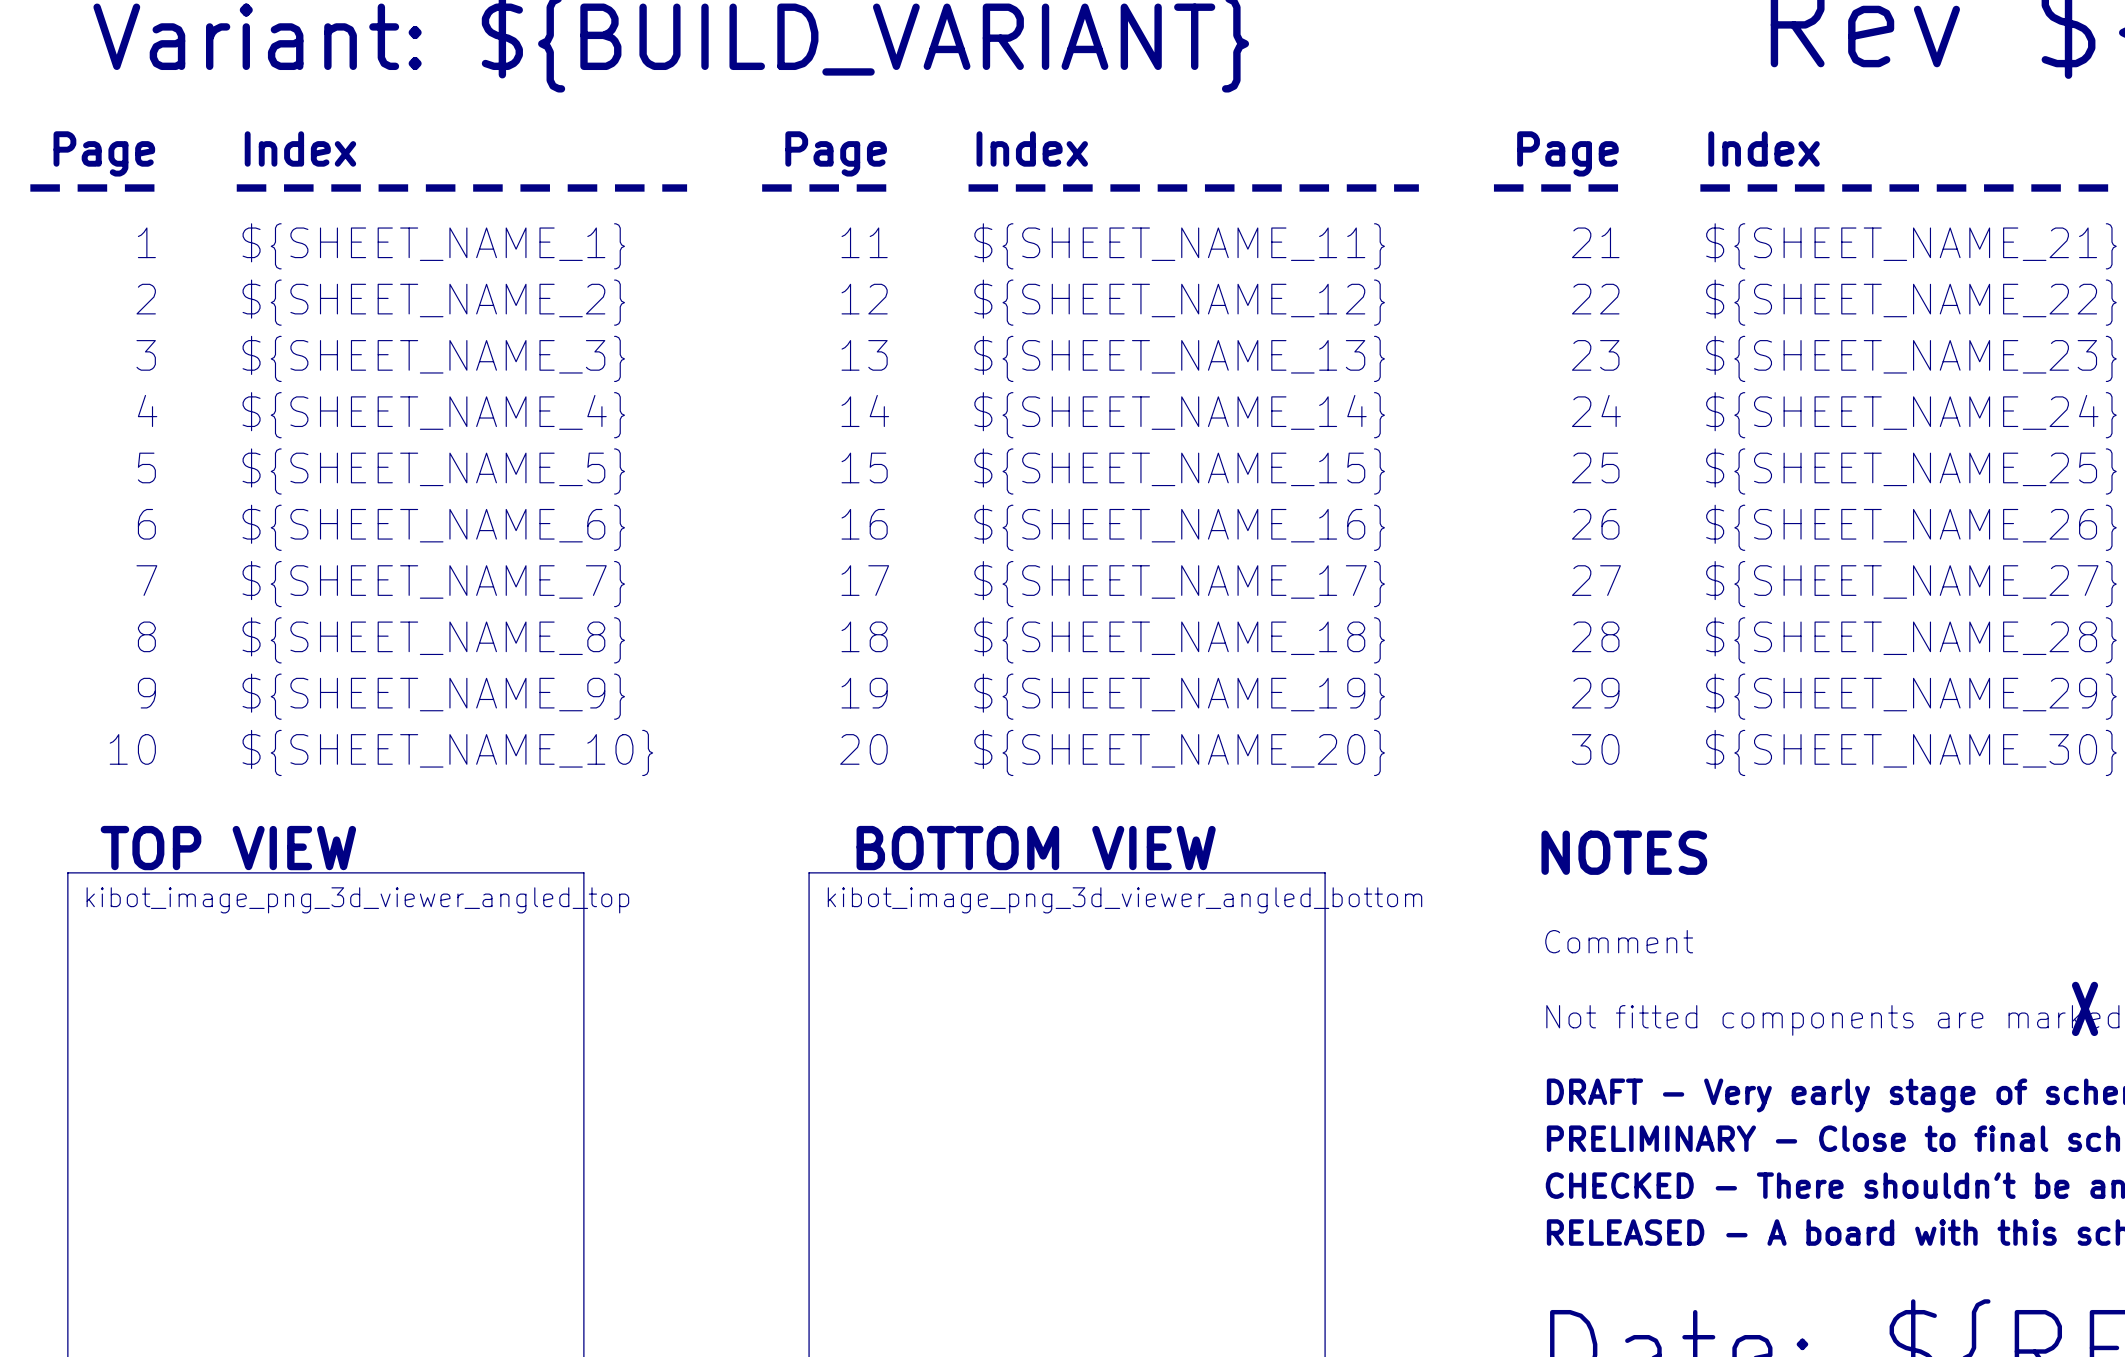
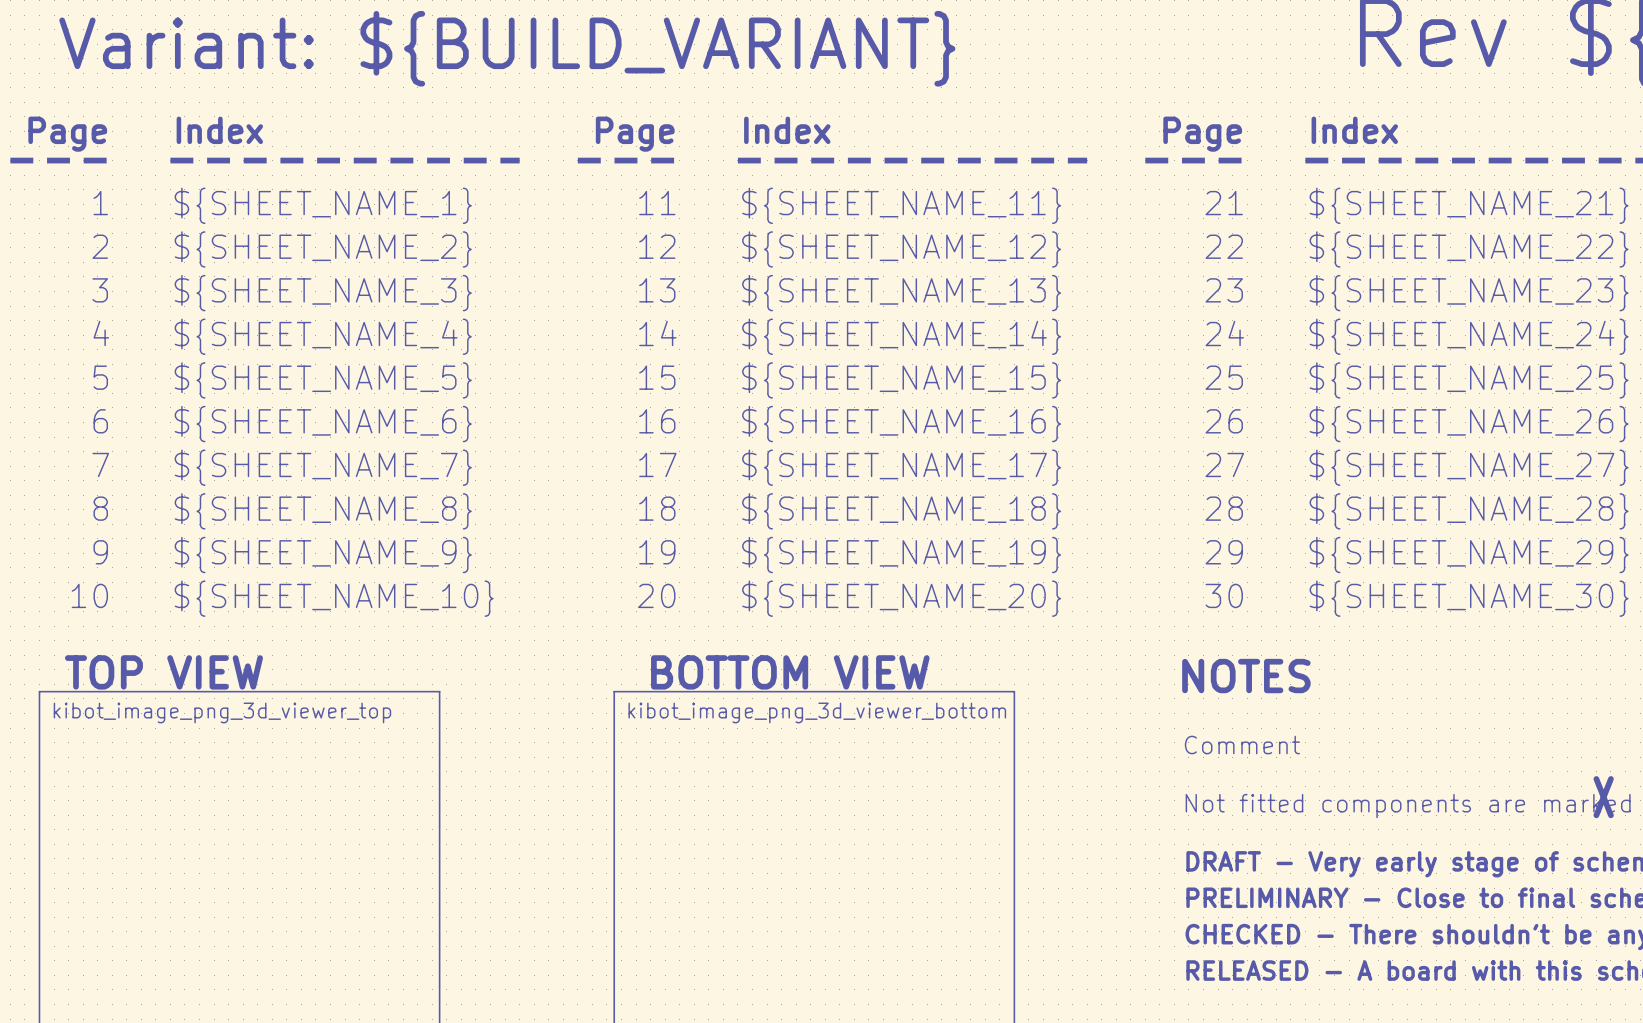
text: kibot_image_png_3d_viewer_angled_top (357, 900) -> kibot_image_png_3d_viewer_top (222, 712)
text: kibot_image_png_3d_viewer_angled_bottom (1124, 900) -> kibot_image_png_3d_viewer_bottom (817, 712)

